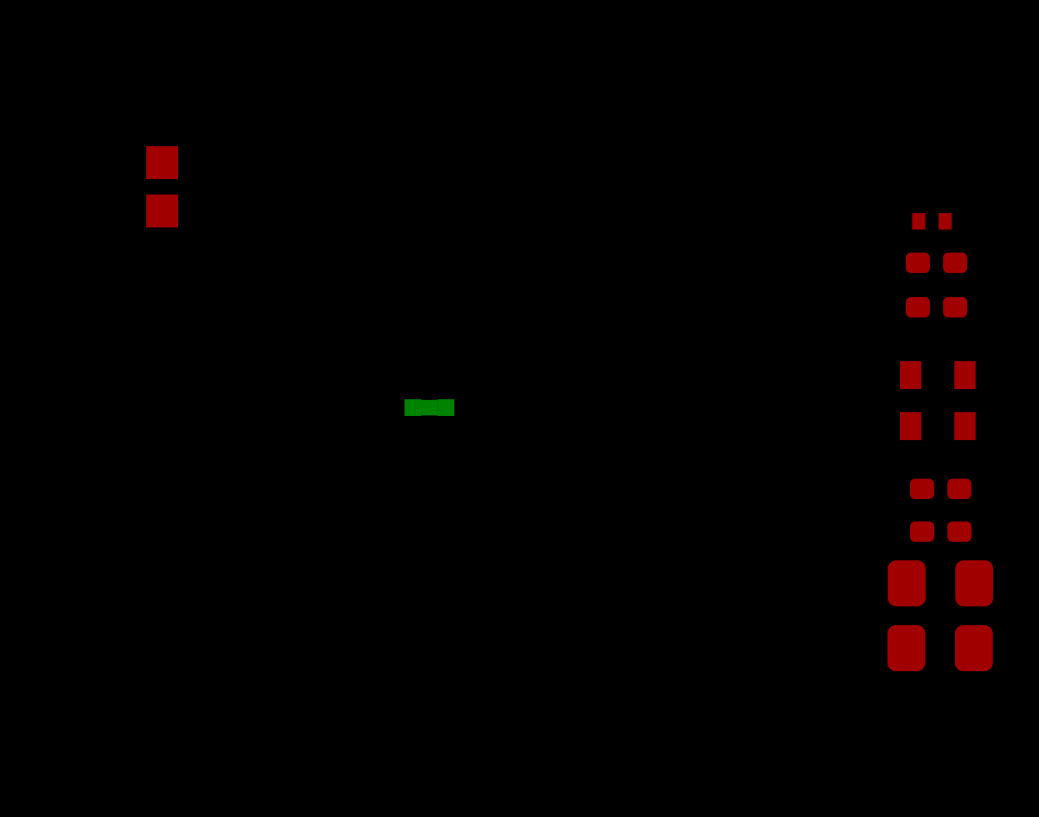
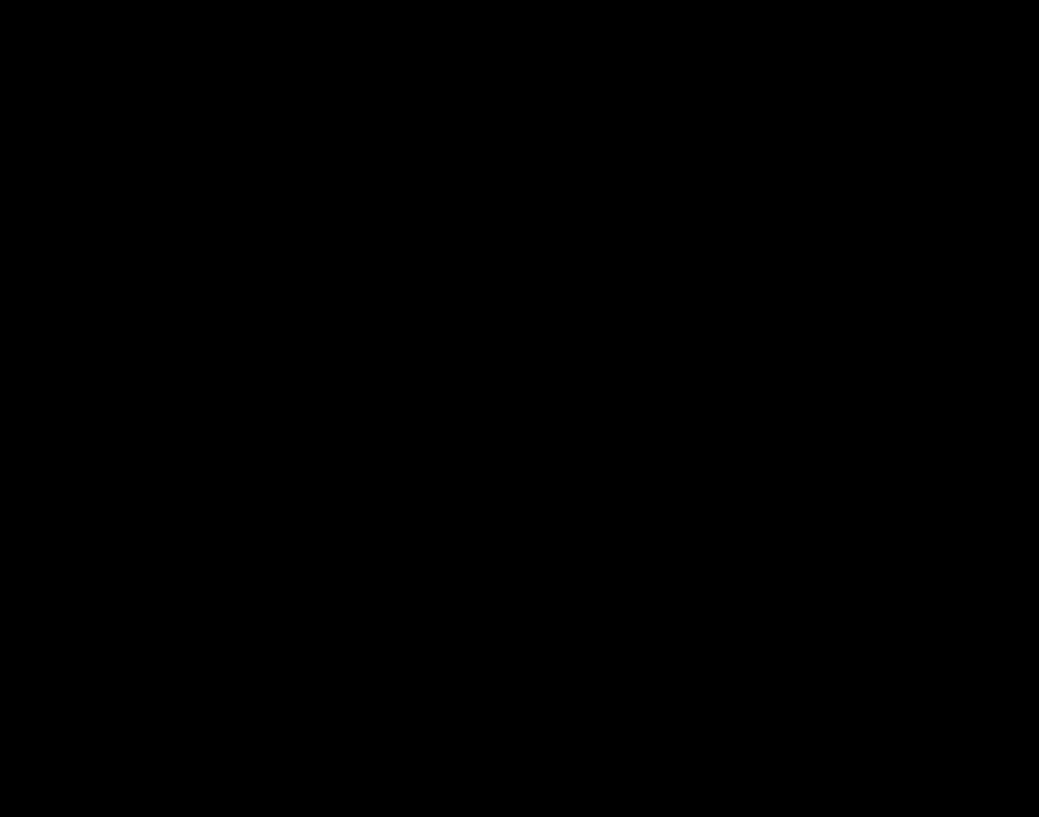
part: (162, 186) -> none
part: (931, 221) -> none
part: (936, 262) -> none
part: (936, 307) -> none
part: (937, 400) -> none
part: (429, 407) -> none
part: (940, 488) -> none
part: (940, 531) -> none
part: (940, 583) -> none
part: (940, 648) -> none

